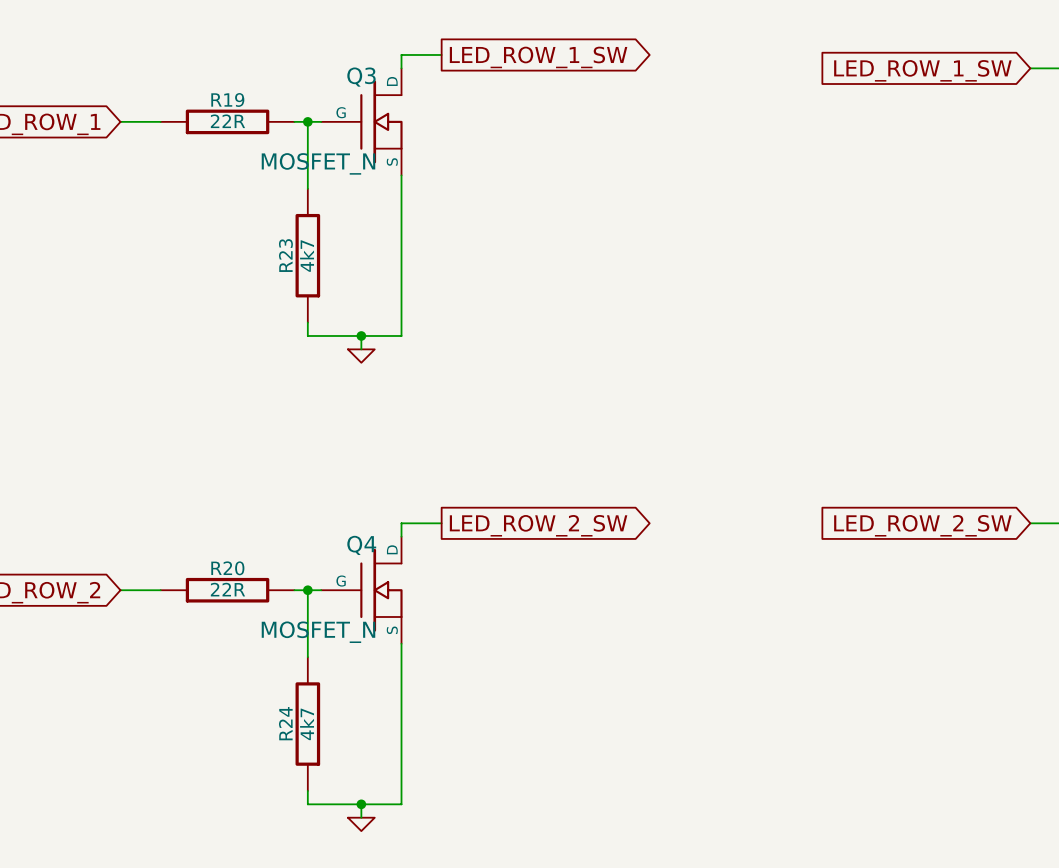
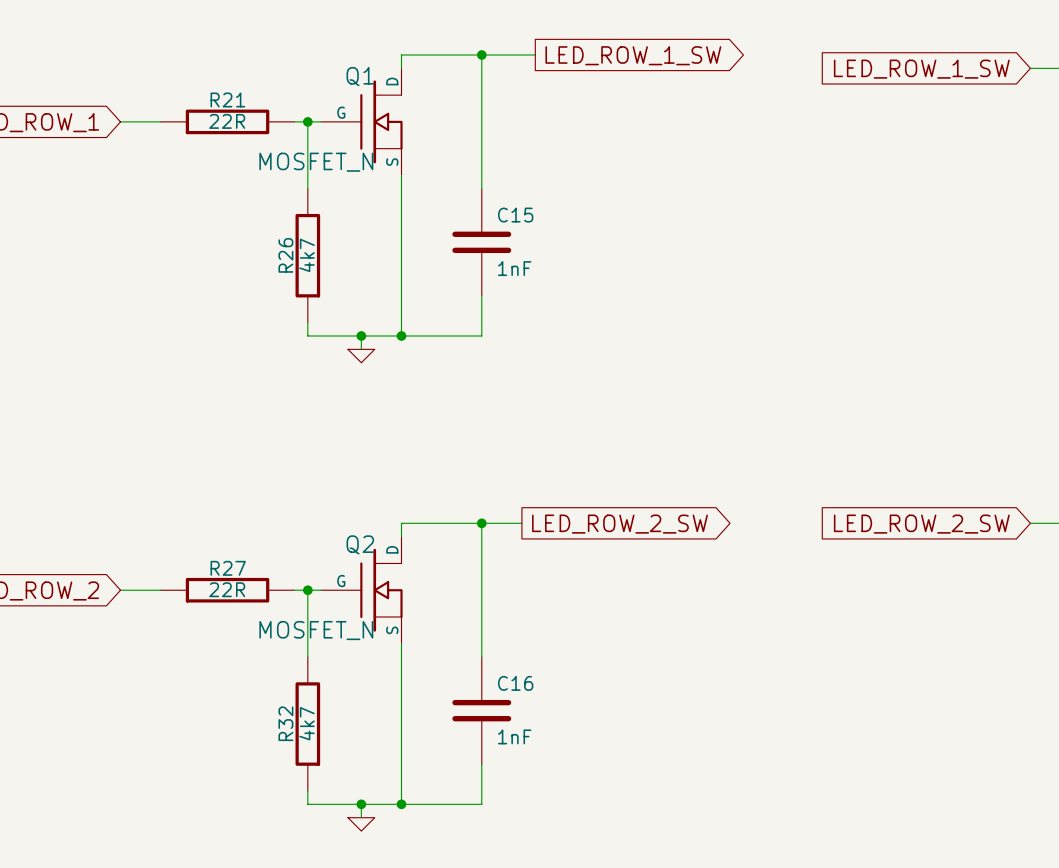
wire: none -> (441, 54) (535, 54)
wire: none -> (481, 54) (481, 188)
junction: none -> (481, 54)
global label position: LED_ROW_1_SW (538, 57) -> LED_ROW_1_SW (633, 55)
Q3 name: Q3 (361, 77) -> Q1 (360, 76)
R19 name: R19 (227, 99) -> R21 (227, 99)
C15: none -> 1nF (481, 242)
R23 name: R23 (285, 255) -> R26 (285, 255)
wire: none -> (481, 295) (481, 335) (401, 335)
junction: none -> (401, 335)
wire: none -> (441, 523) (521, 523)
wire: none -> (481, 523) (481, 657)
junction: none -> (481, 523)
global label position: LED_ROW_2_SW (538, 525) -> LED_ROW_2_SW (620, 524)
Q4 name: Q4 (361, 545) -> Q2 (360, 544)
R20 name: R20 (227, 568) -> R27 (228, 568)
C16: none -> 1nF (481, 710)
R24 name: R24 (285, 723) -> R32 (285, 723)
wire: none -> (481, 764) (481, 804) (401, 804)
junction: none -> (401, 804)

